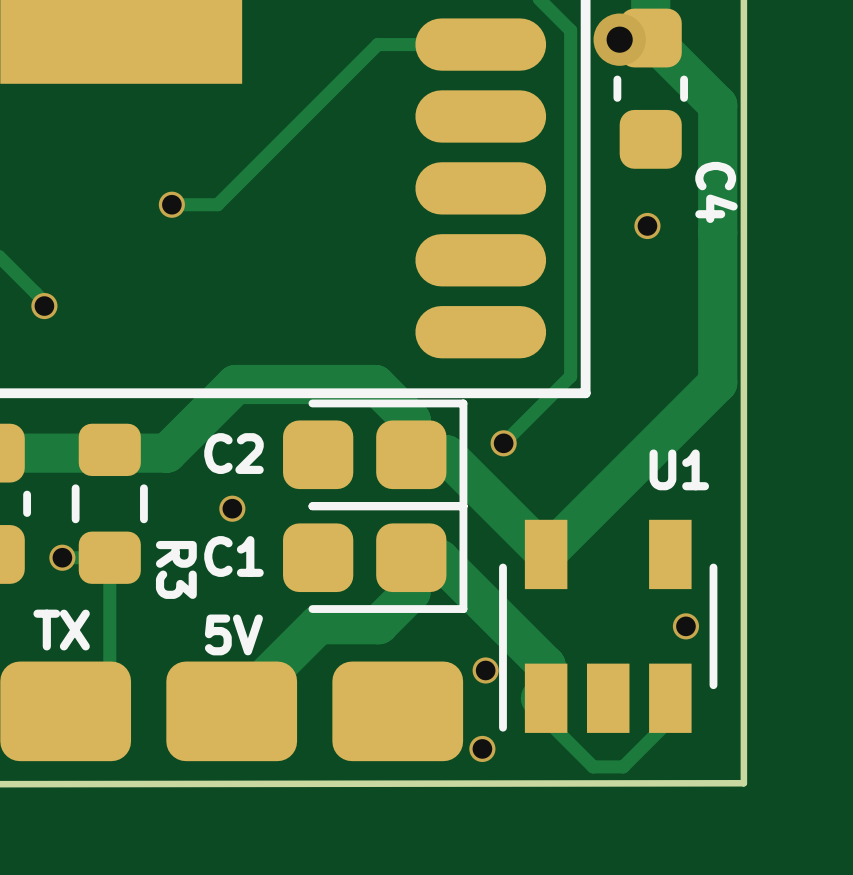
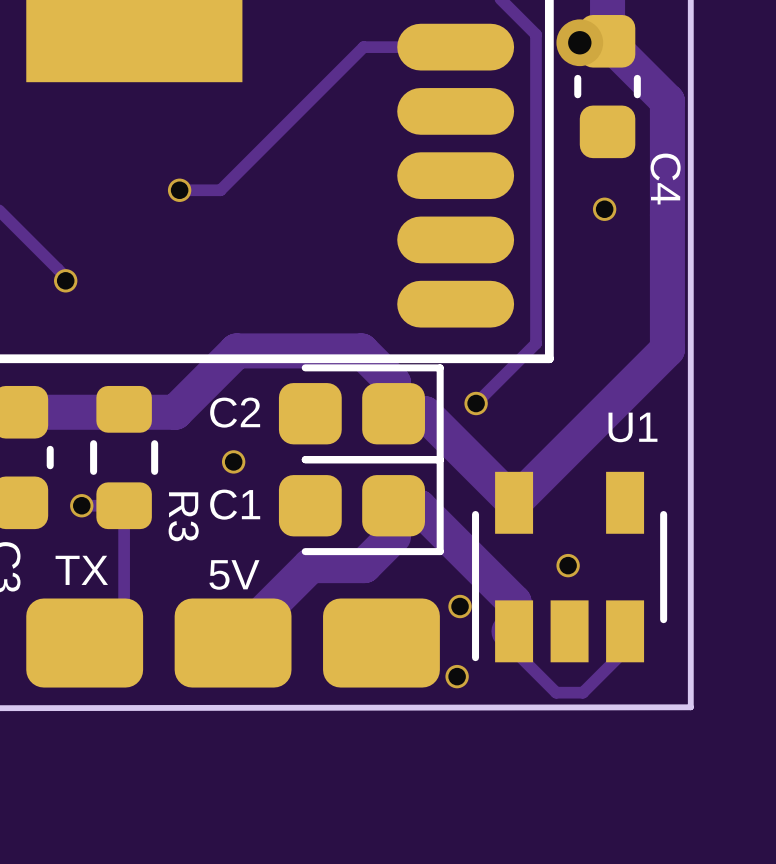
via position: (685, 626) -> (568, 565)

